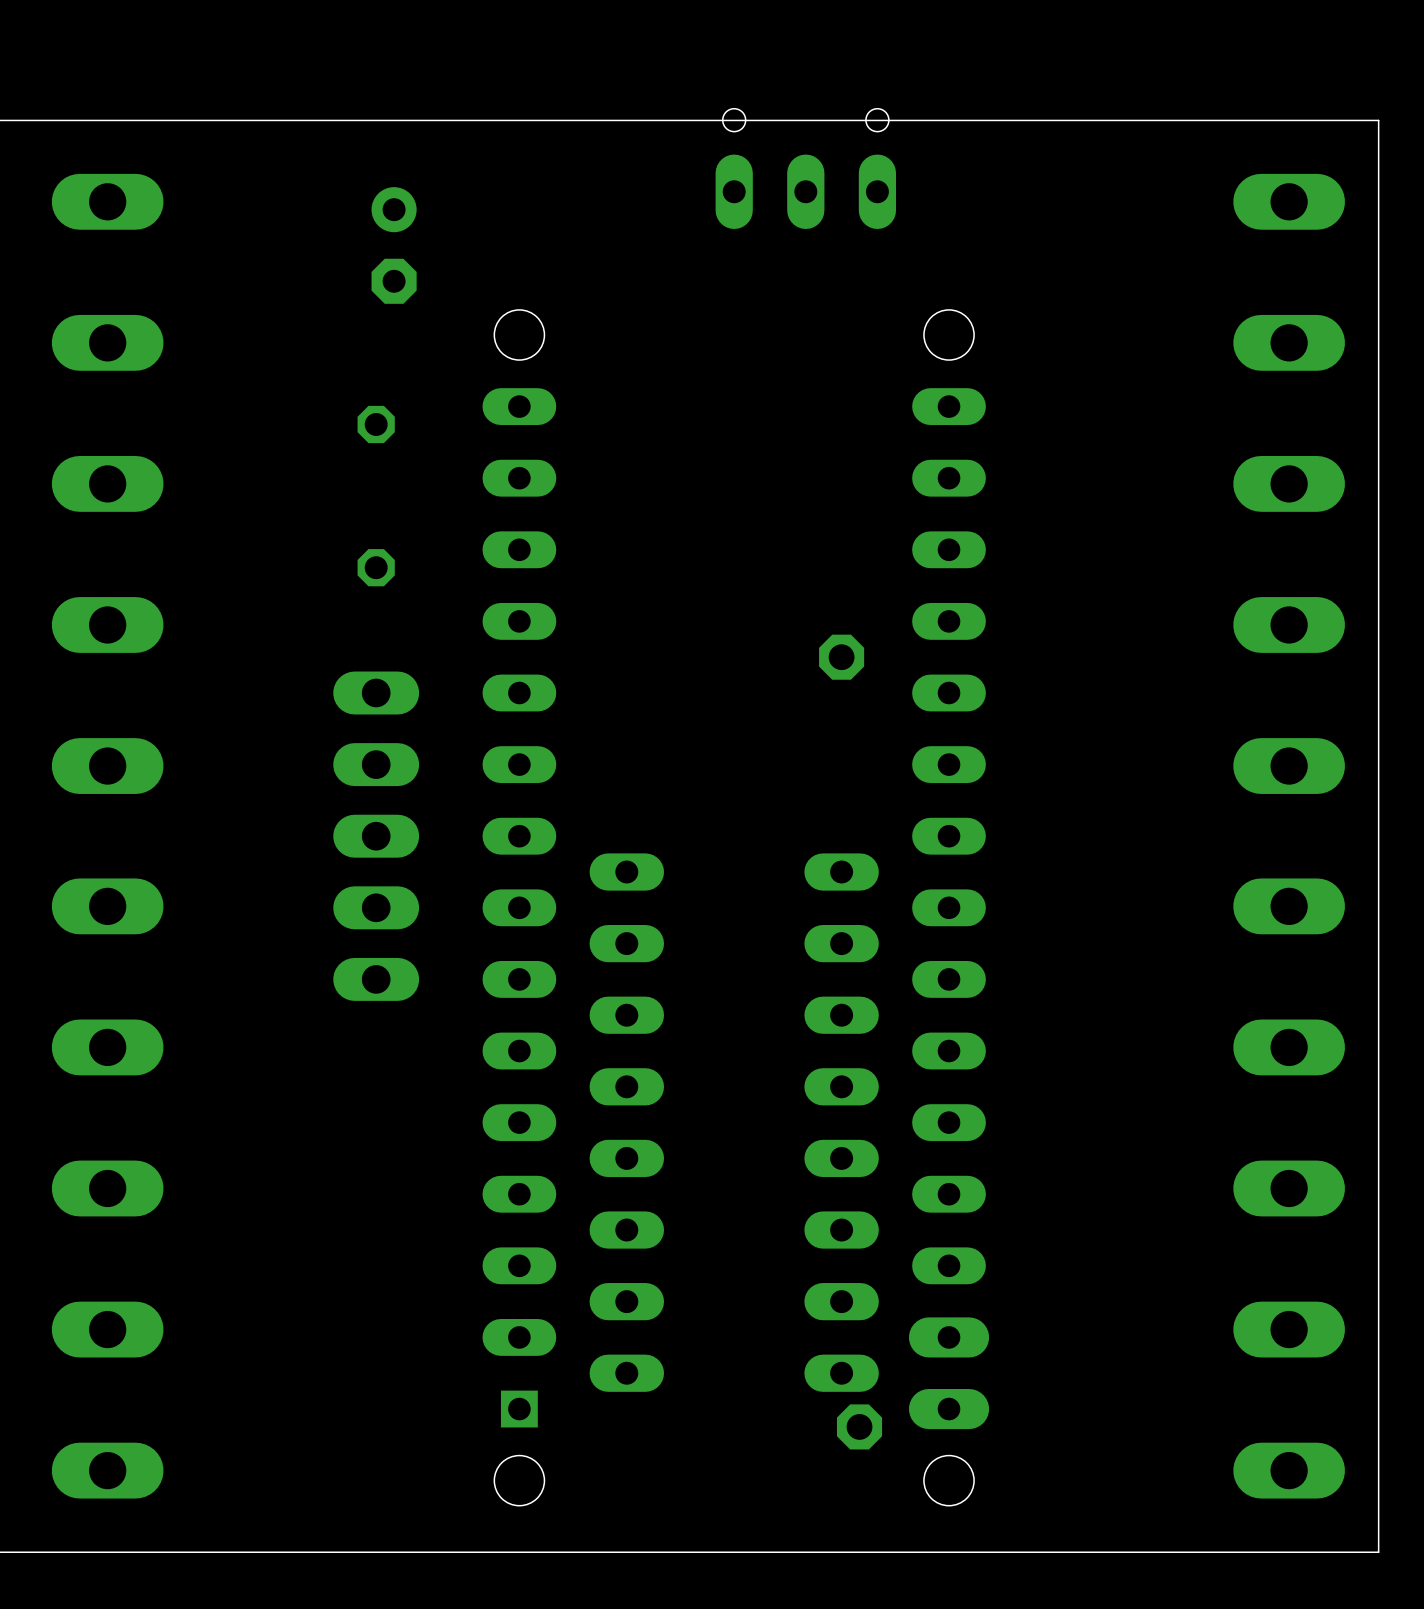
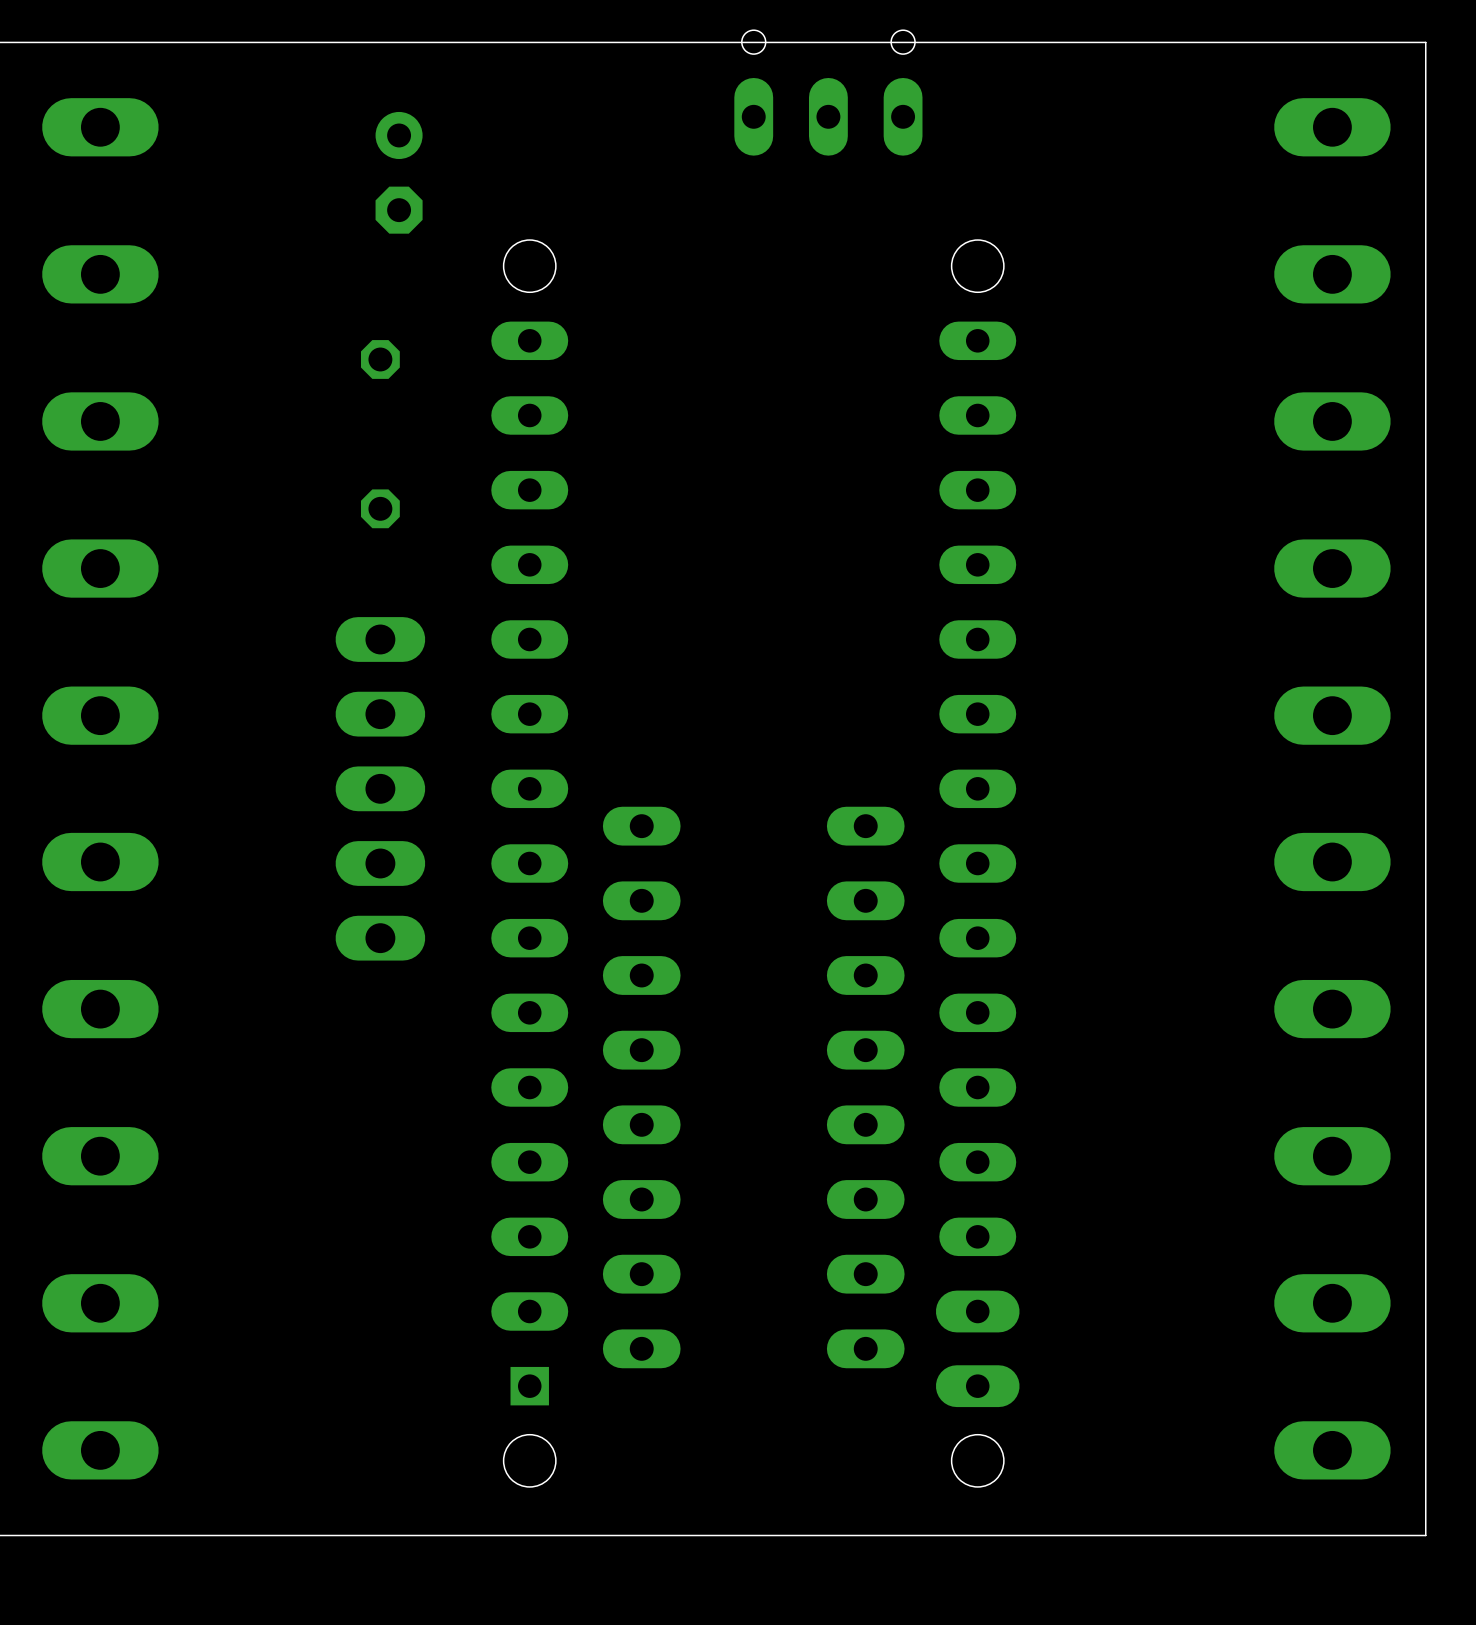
part: (841, 657) -> none
part: (859, 1426) -> none

